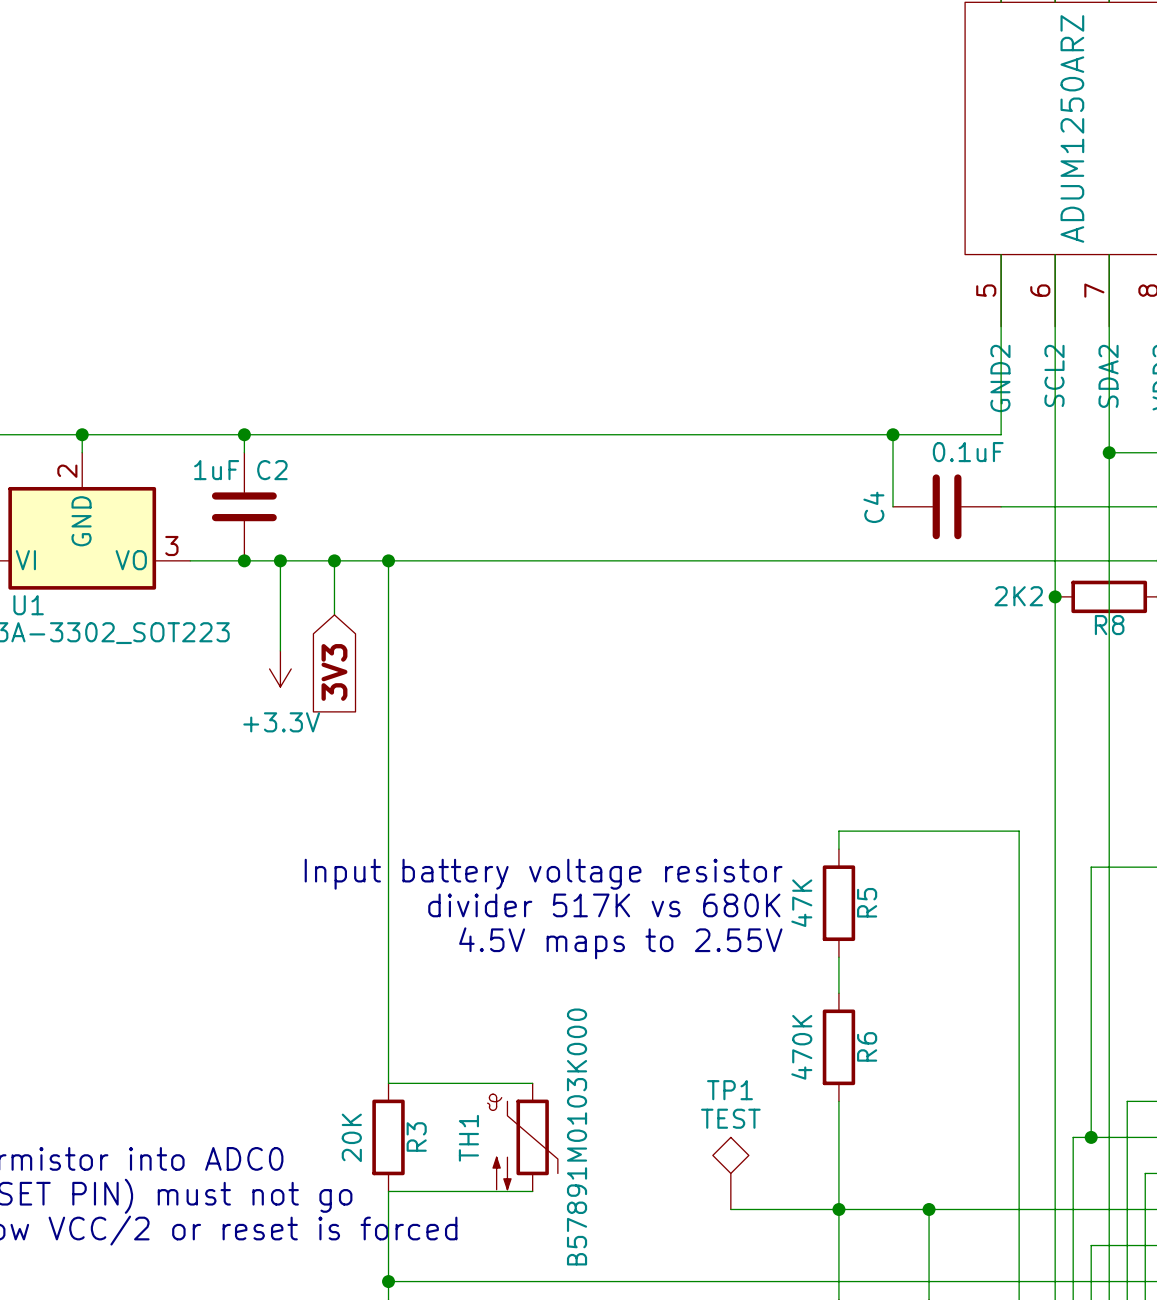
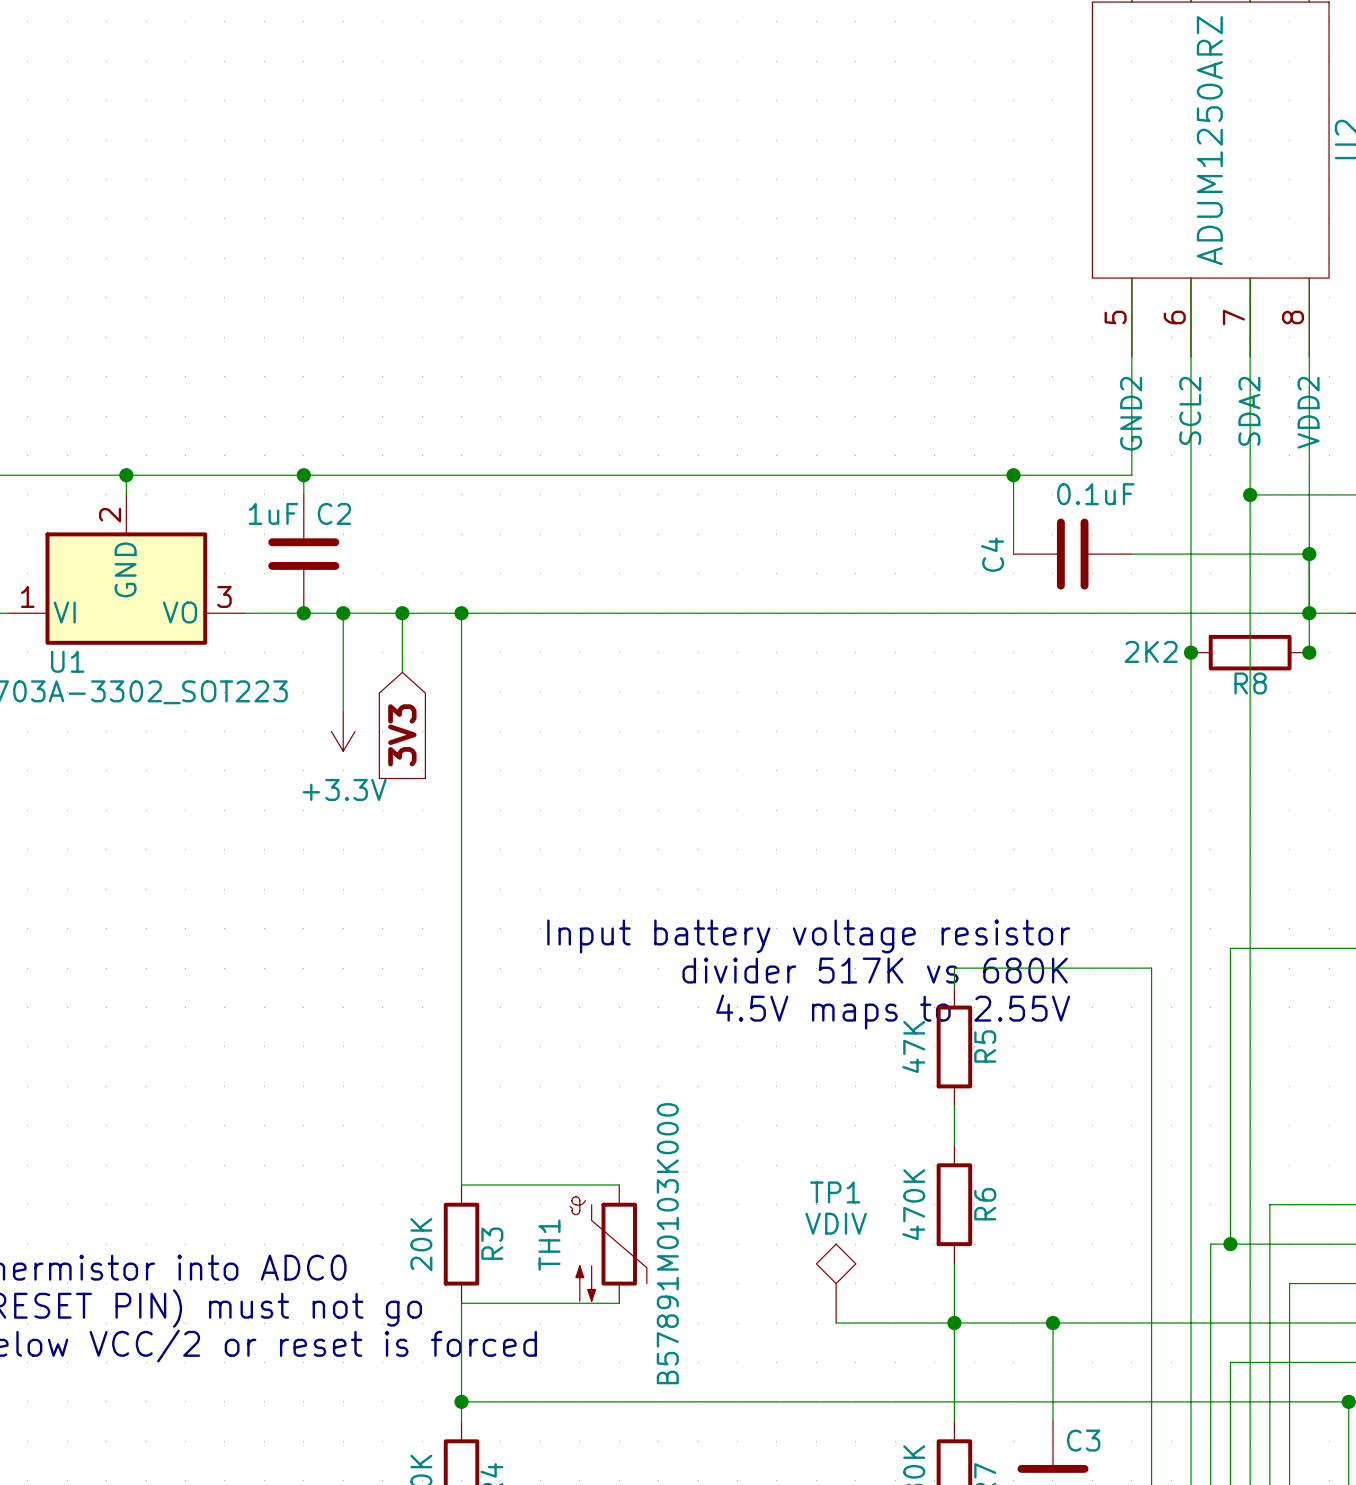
wire: (838, 849) (838, 831) (1019, 831) (1019, 885) -> (954, 987) (954, 968) (1151, 968)
text position: Input battery voltage resistor (543, 874) -> Input battery voltage resistor (808, 936)
R5 position: (838, 903) -> (954, 1046)
text position: divider 517K vs 680K (604, 905) -> divider 517K vs 680K (875, 970)
text position: 4.5V maps to 2.55V (620, 943) -> 4.5V maps to 2.55V (893, 1012)
wire: (838, 957) (838, 993) -> (954, 1106) (954, 1145)
R6 position: (838, 1047) -> (954, 1204)
wire: (838, 1101) (838, 1155) -> none
TP1 value: TEST (730, 1118) -> VDIV (836, 1223)

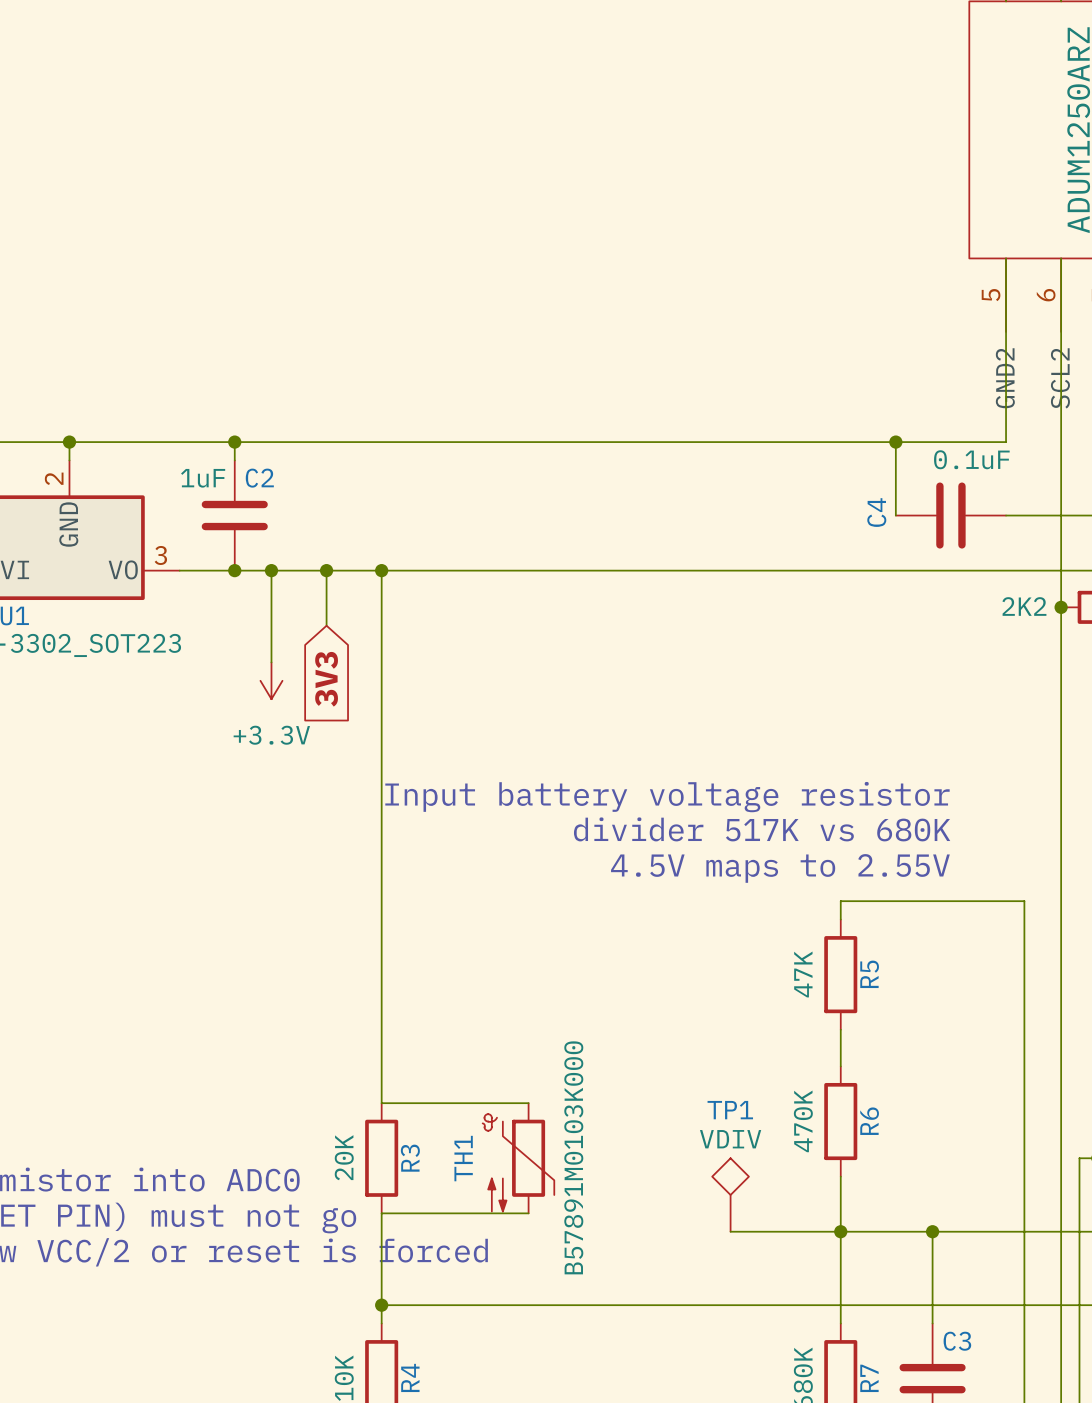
text: none -> Input battery voltage resistor (667, 797)
text: Input battery voltage resistor (808, 936) -> 4.5V maps to 2.55V (780, 868)
text position: divider 517K vs 680K (875, 970) -> divider 517K vs 680K (762, 829)
text: 4.5V maps to 2.55V (893, 1012) -> none

